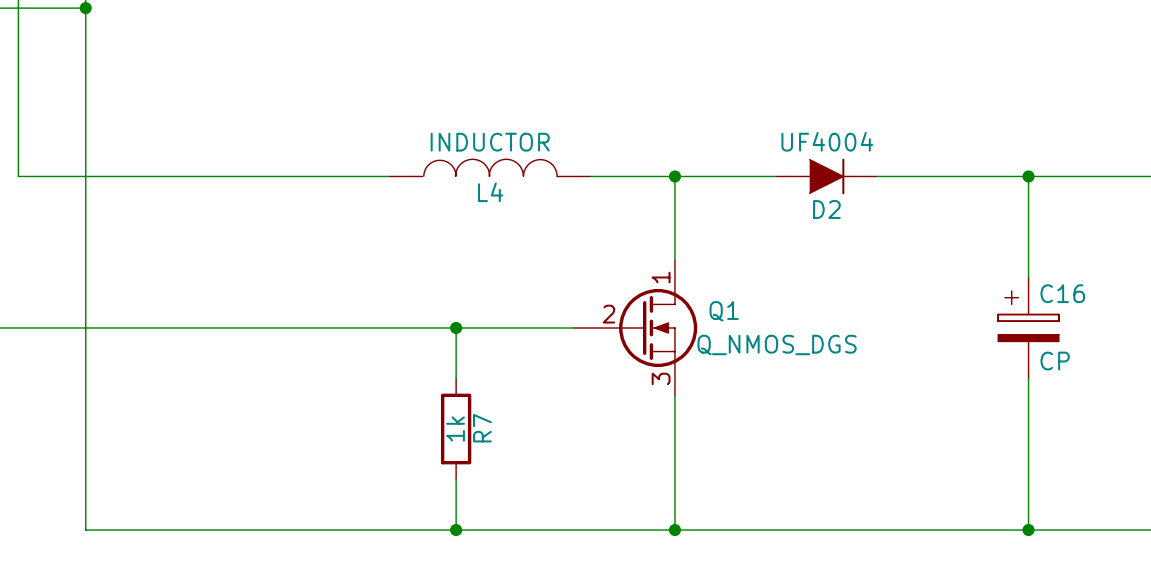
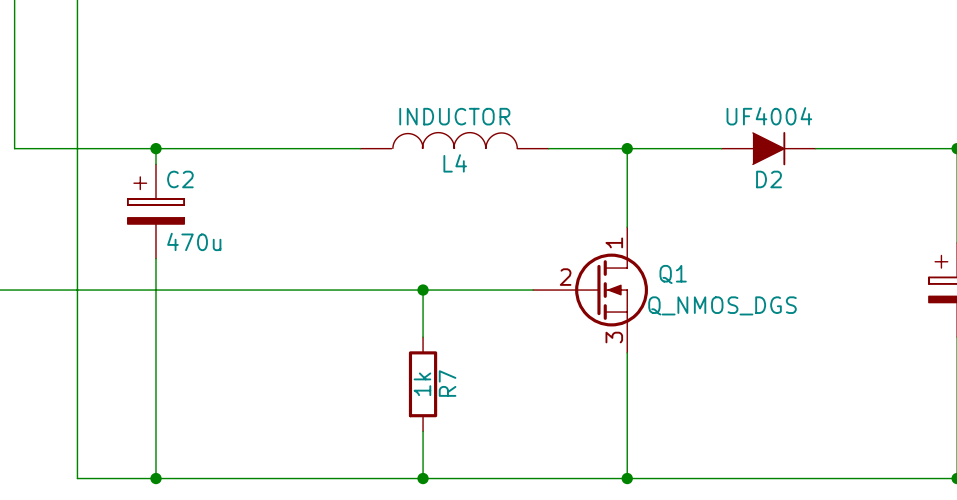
wire: none -> (155, 148) (155, 164)
junction: none -> (155, 148)
C2: none -> 470u (155, 211)
wire: none -> (155, 258) (155, 478)
junction: none -> (155, 478)

